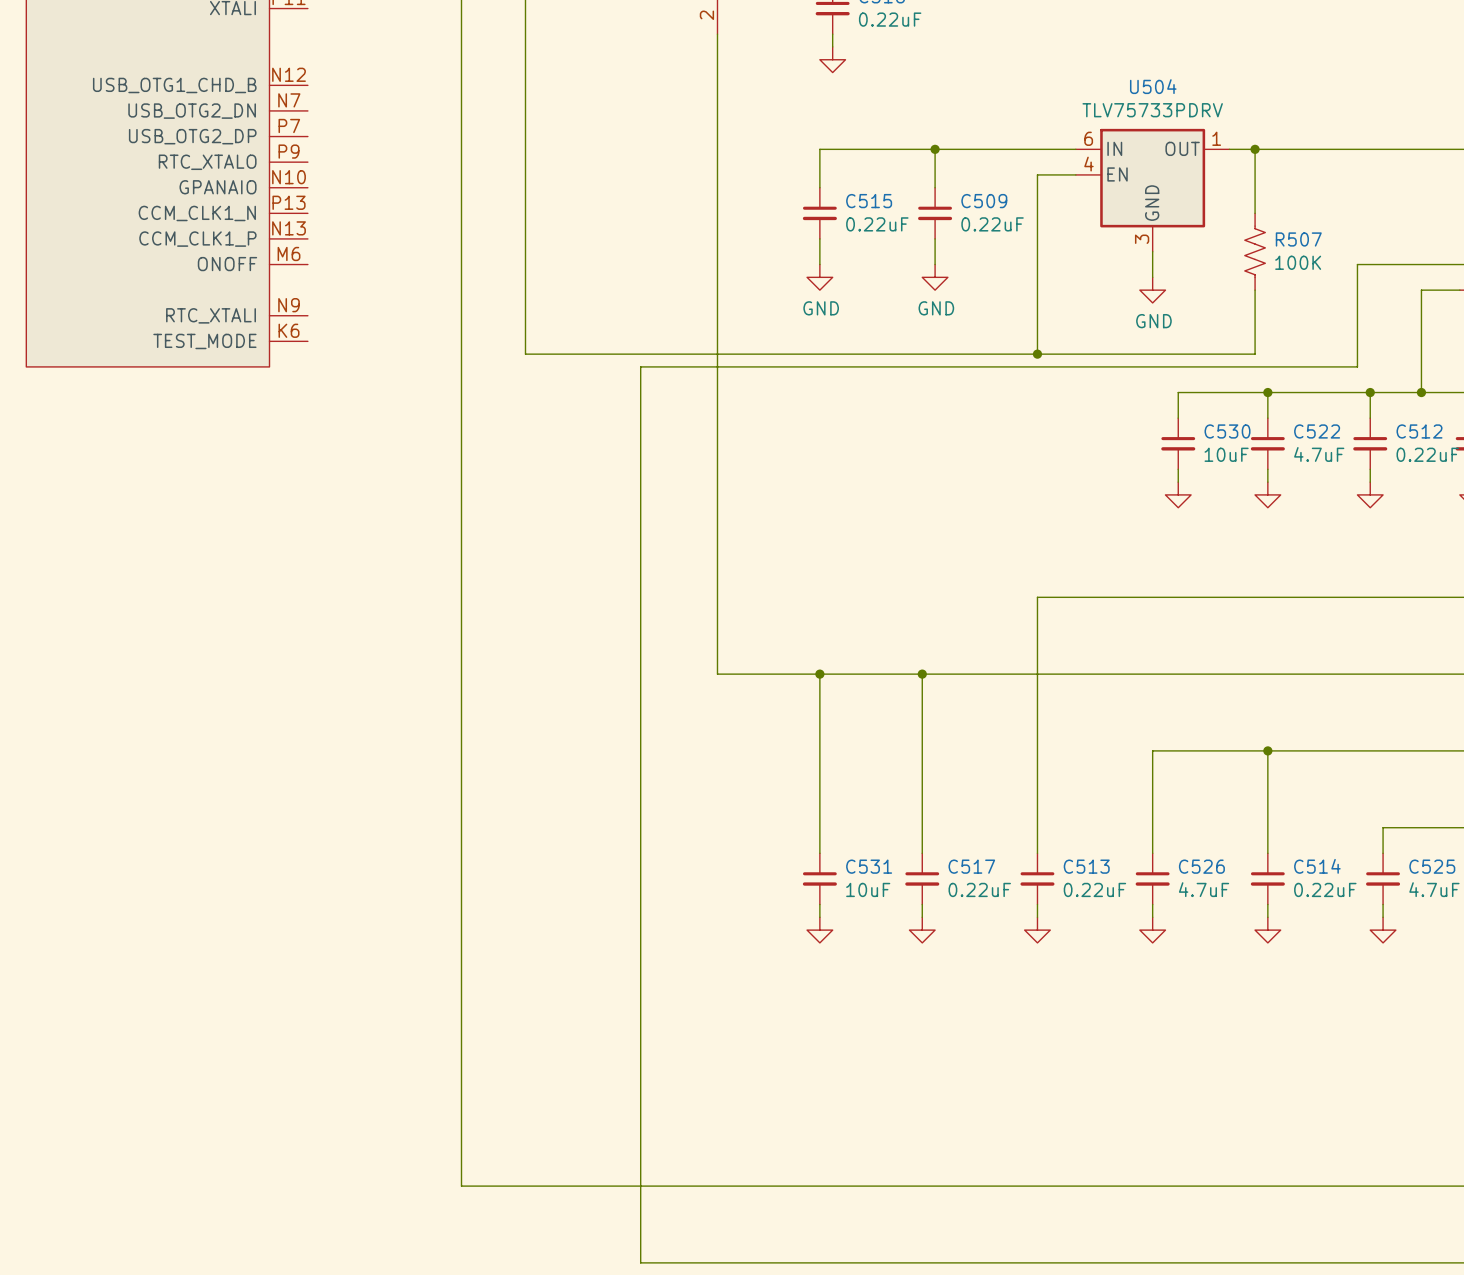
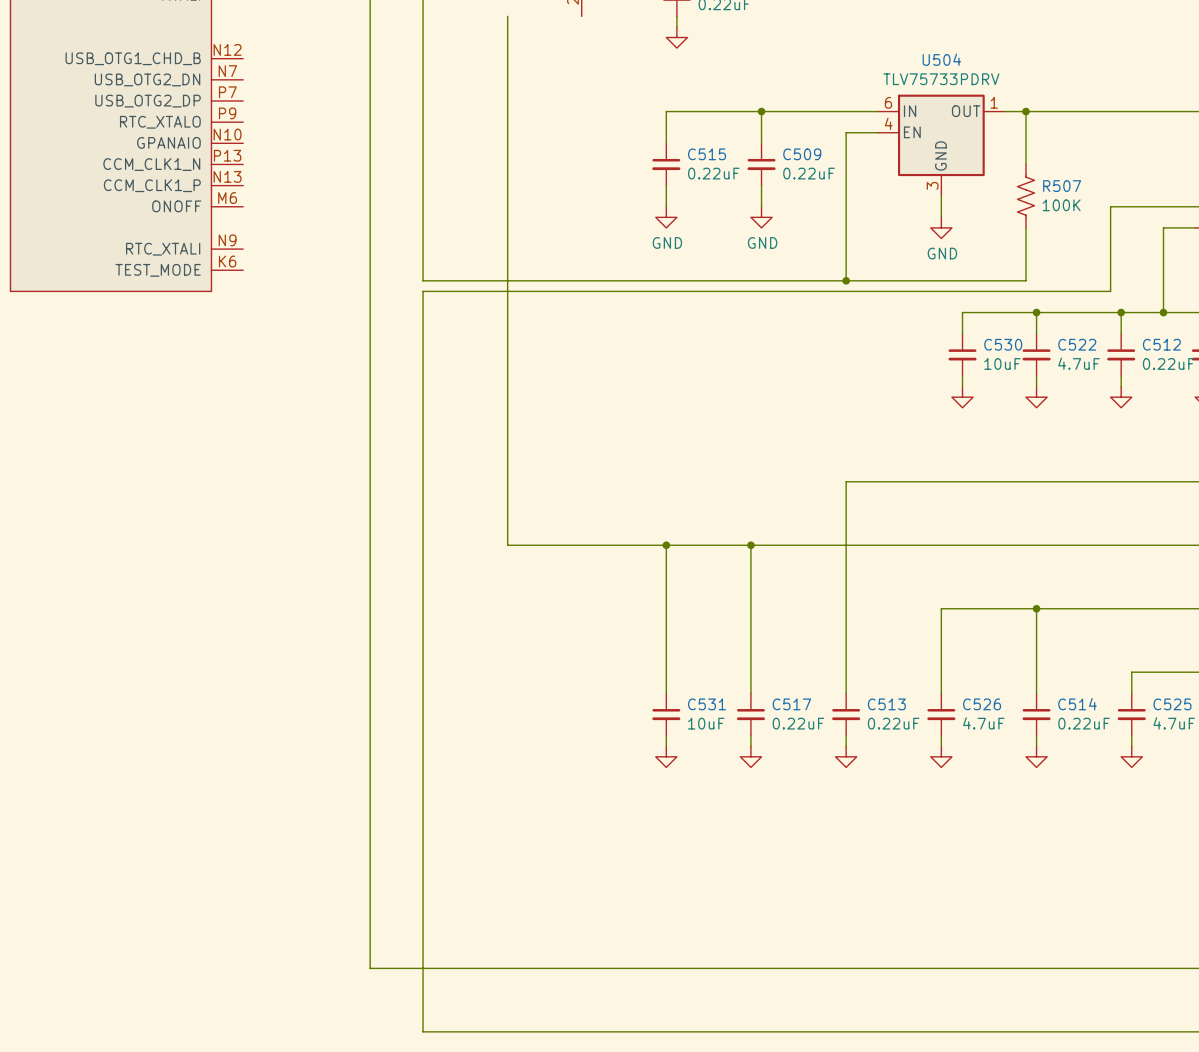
wire: (717, 34) (717, 674) -> (507, 16) (507, 545) (581, 545)
wire: (640, 366) (640, 1262) -> (518, 291) (423, 291) (423, 1031) (518, 1031)

